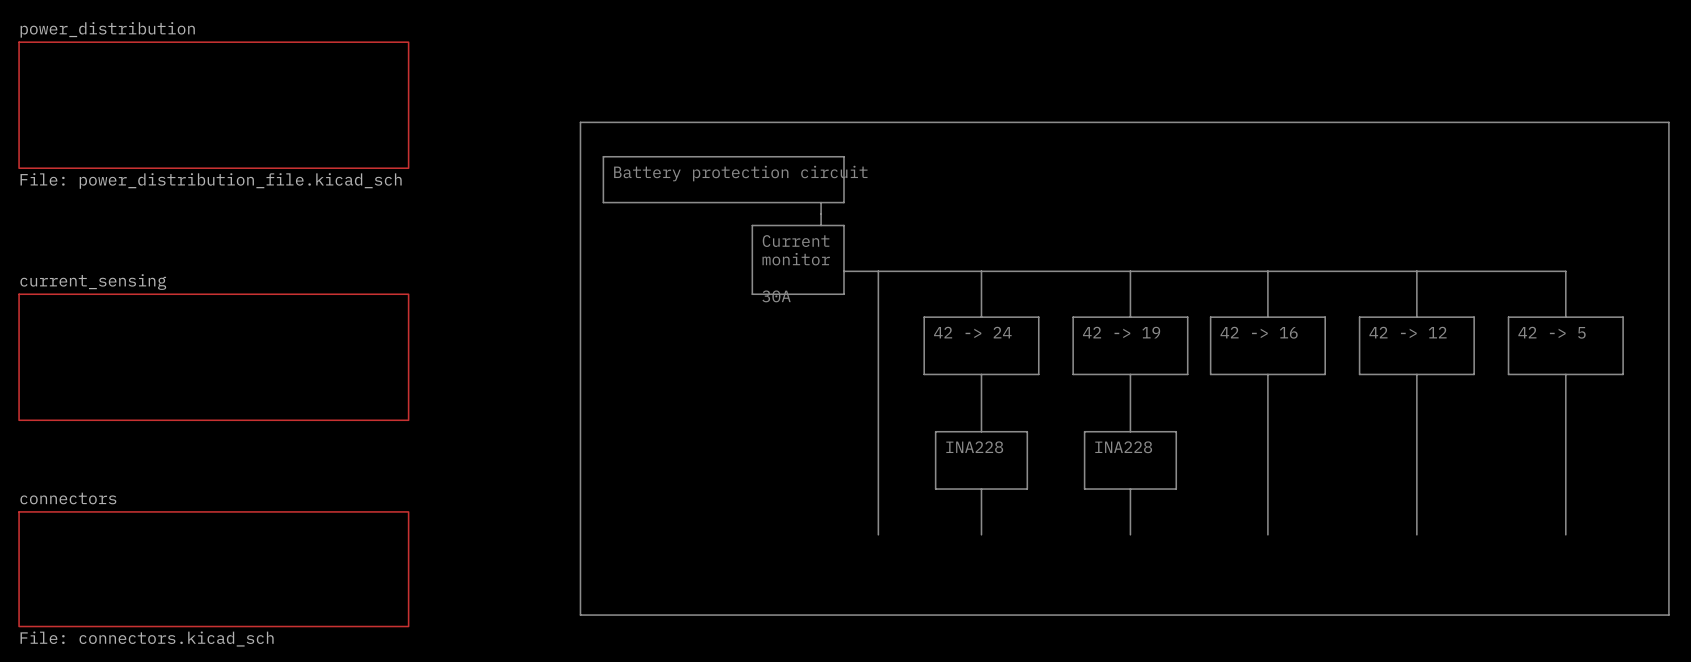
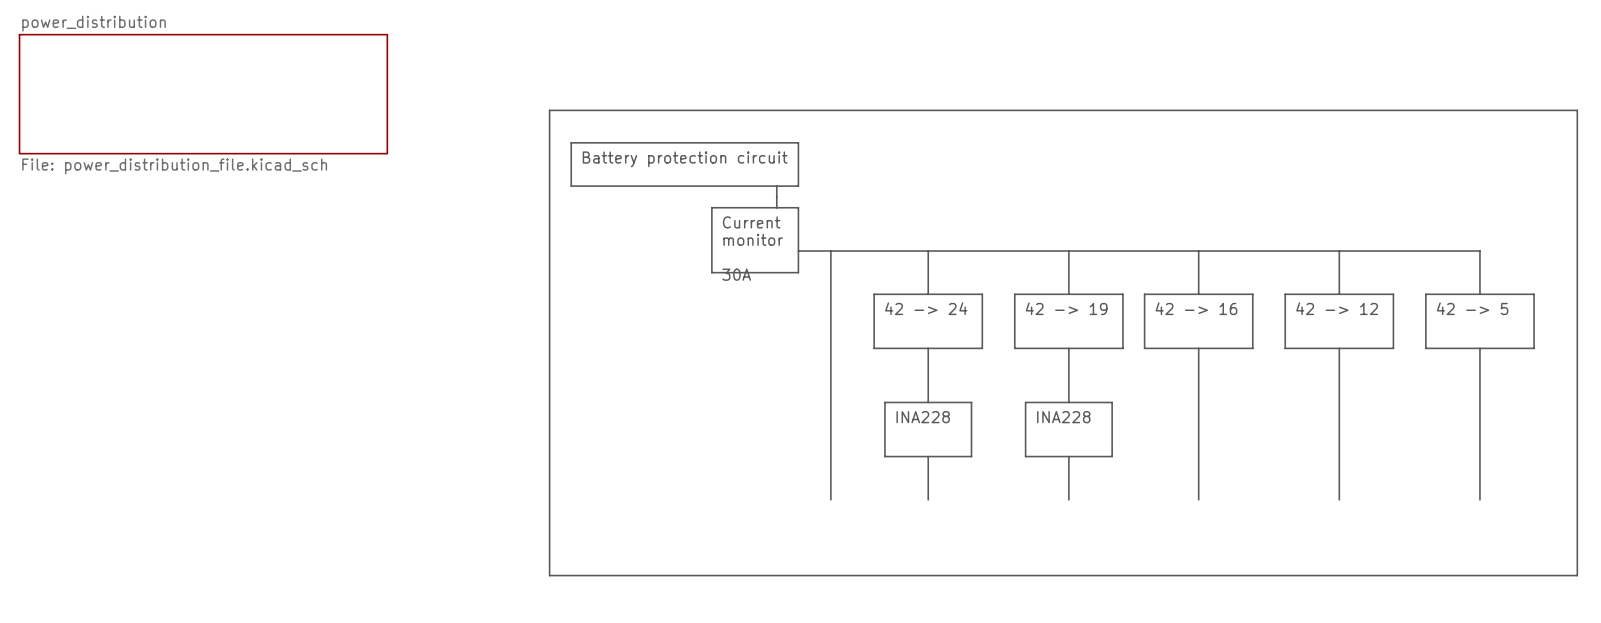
sheet current_sensing: (213, 357) -> none
sheet connectors: File: connectors.kicad_sch (213, 569) -> none

